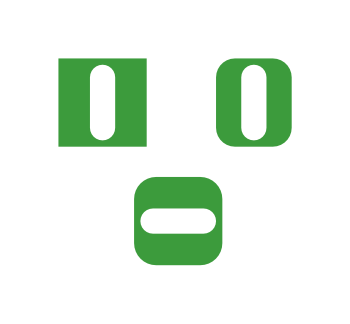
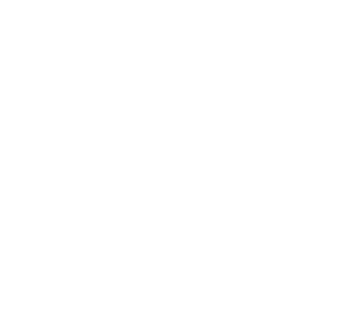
part: (175, 161) -> none

